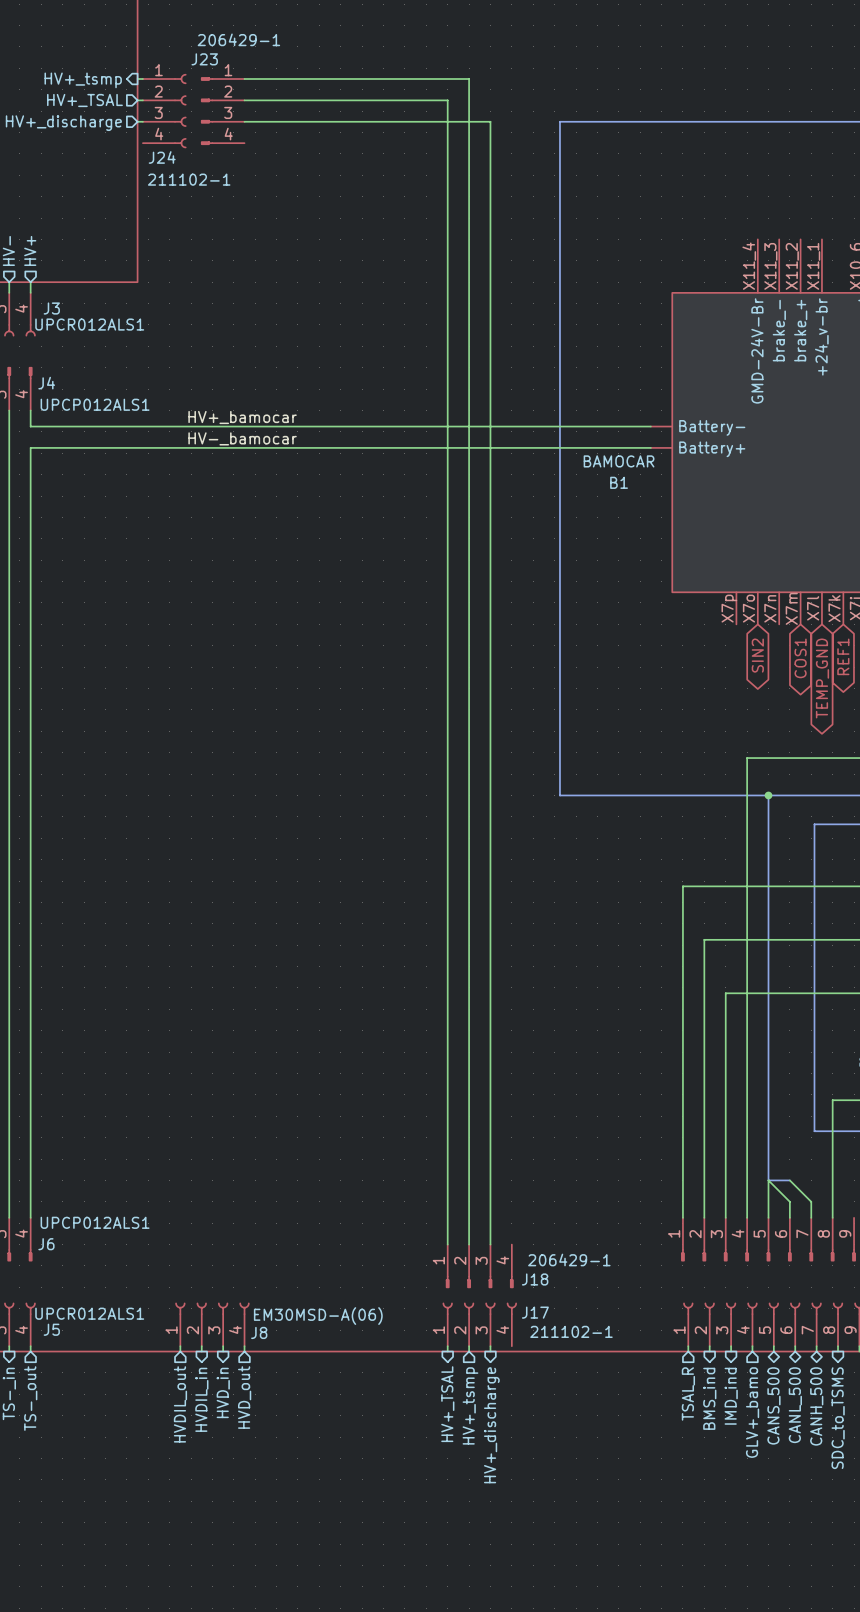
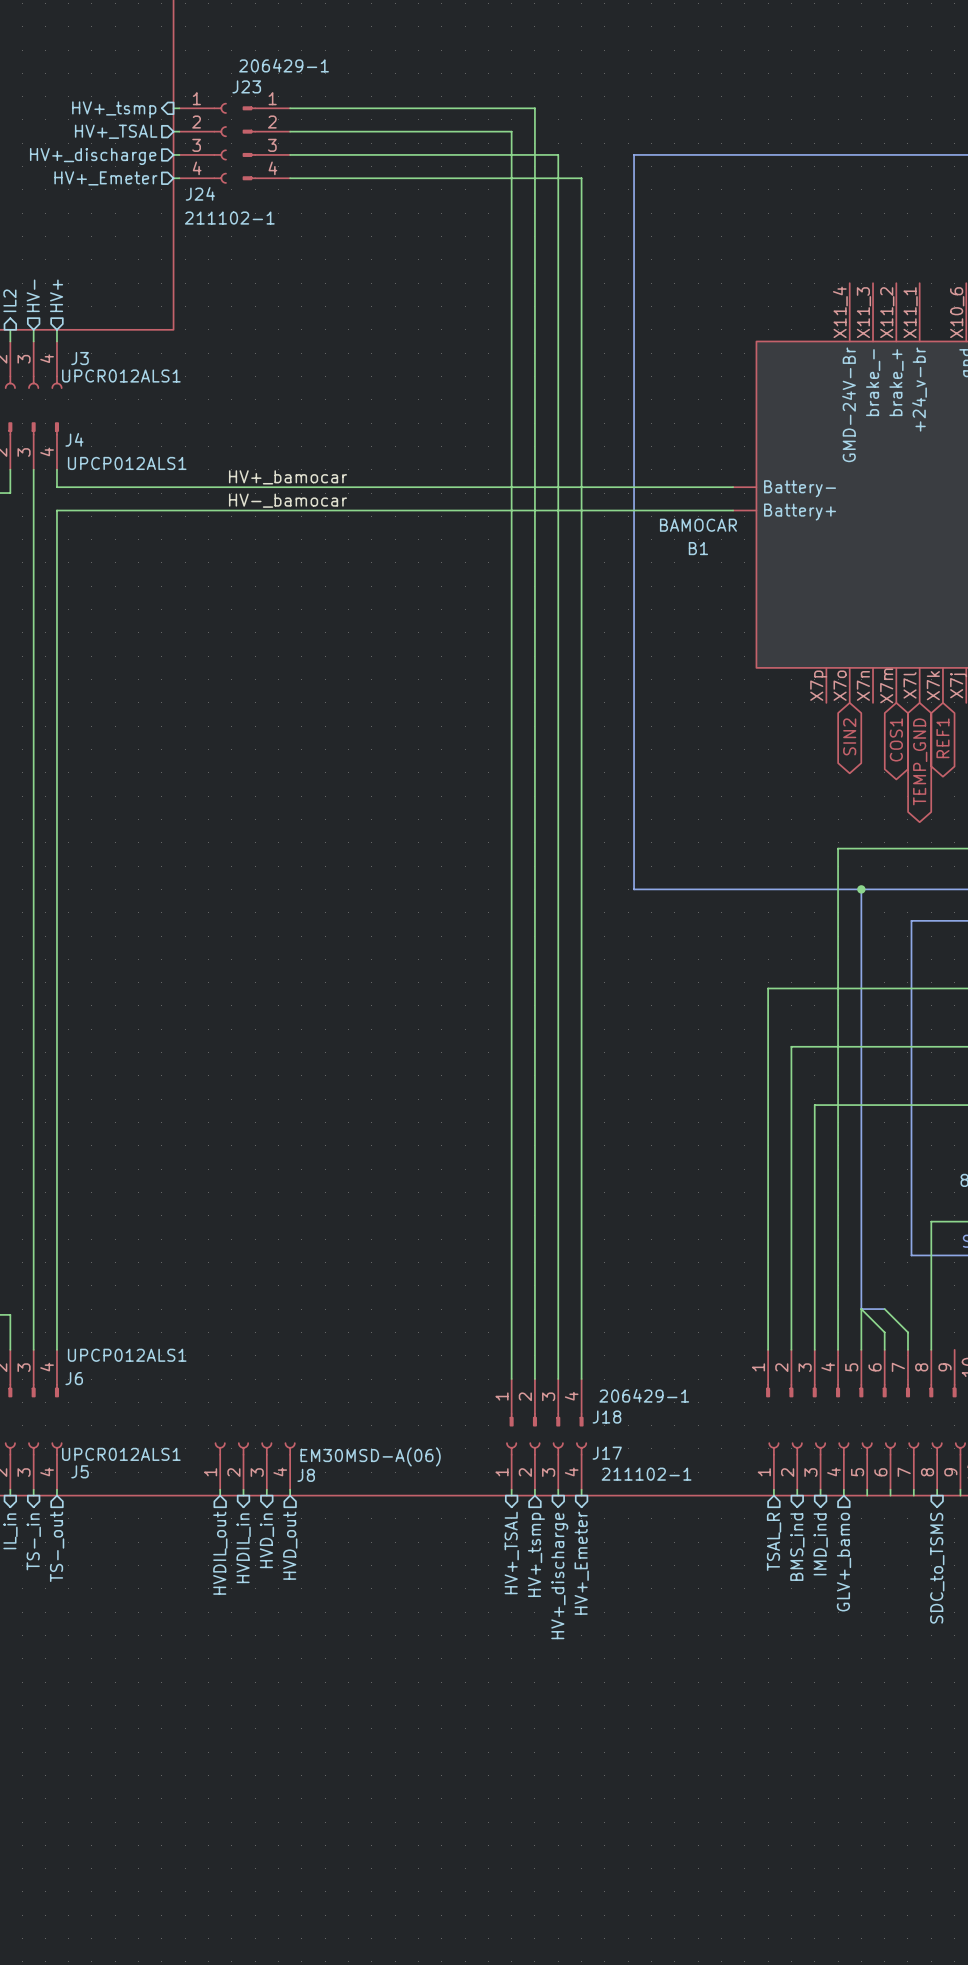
sheet pin: none -> HV+_Emeter (105, 178)
wire: none -> (173, 178) (179, 178)
wire: none -> (290, 178) (581, 178) (581, 1379)
wire: none -> (581, 1489) (581, 1495)
sheet pin: CANS_500 (773, 1405) -> none
sheet pin: CANL_500 (795, 1405) -> none
sheet pin: CANH_500 (816, 1406) -> none
sheet pin: none -> HV+_Emeter (581, 1563)

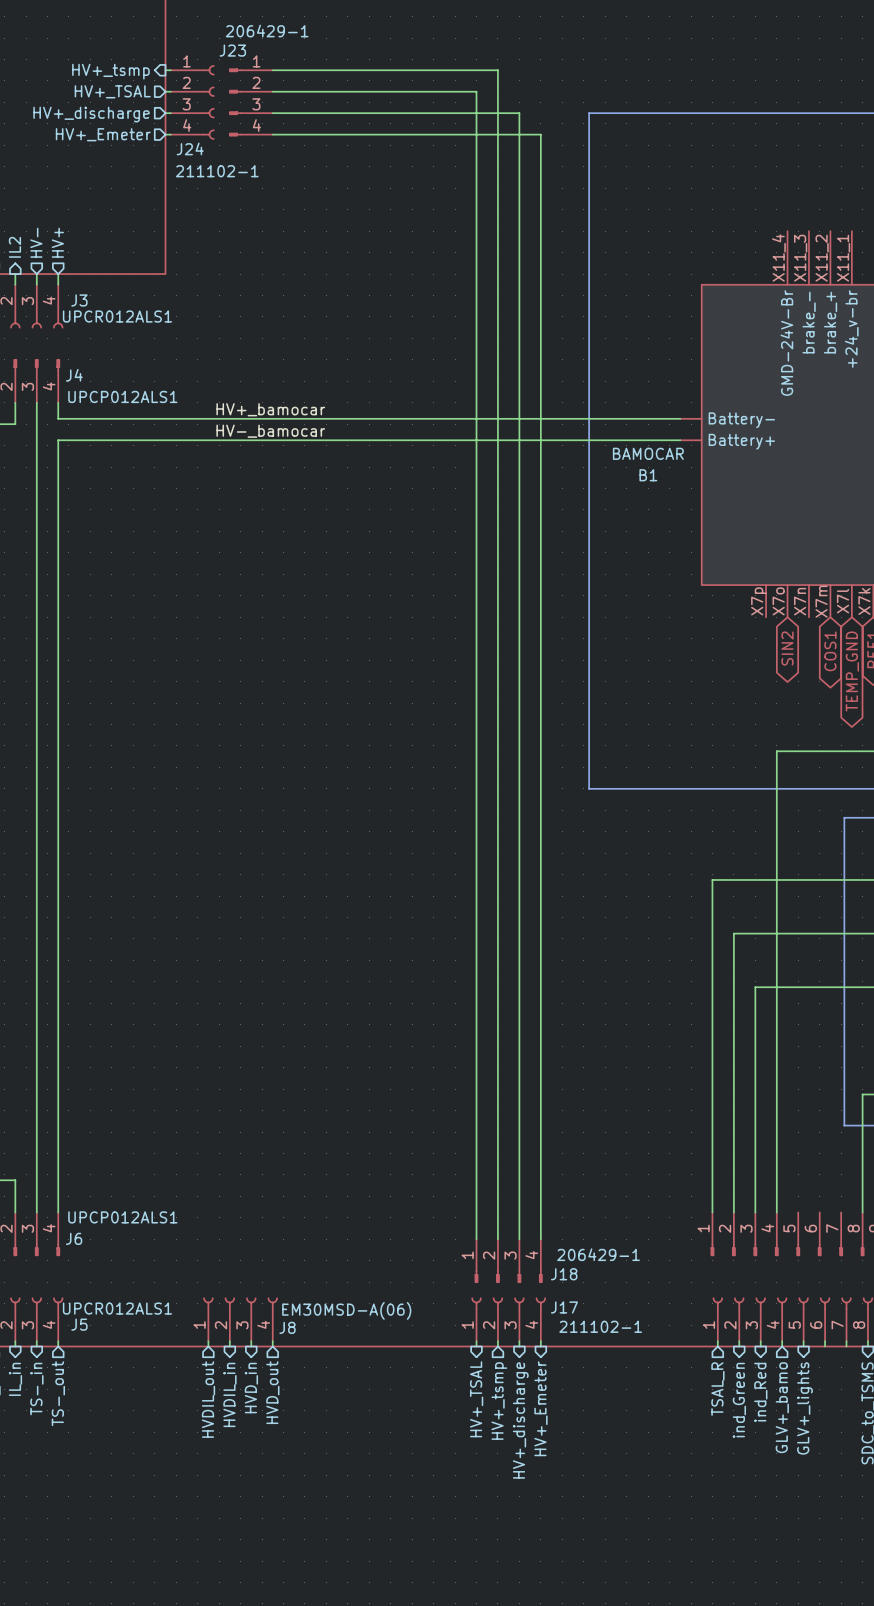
bus: (861, 889) (861, 1309) (884, 1309) -> none
junction: (861, 889) -> none
wire: (884, 1309) (907, 1332) (907, 1349) -> none
wire: (861, 1349) (861, 1309) (884, 1332) (884, 1349) -> none
sheet pin: IMD_ind (820, 1544) -> ind_Red (760, 1392)
sheet pin: BMS_ind (797, 1547) -> ind_Green (739, 1400)
sheet pin: none -> GLV+_lights (804, 1408)

